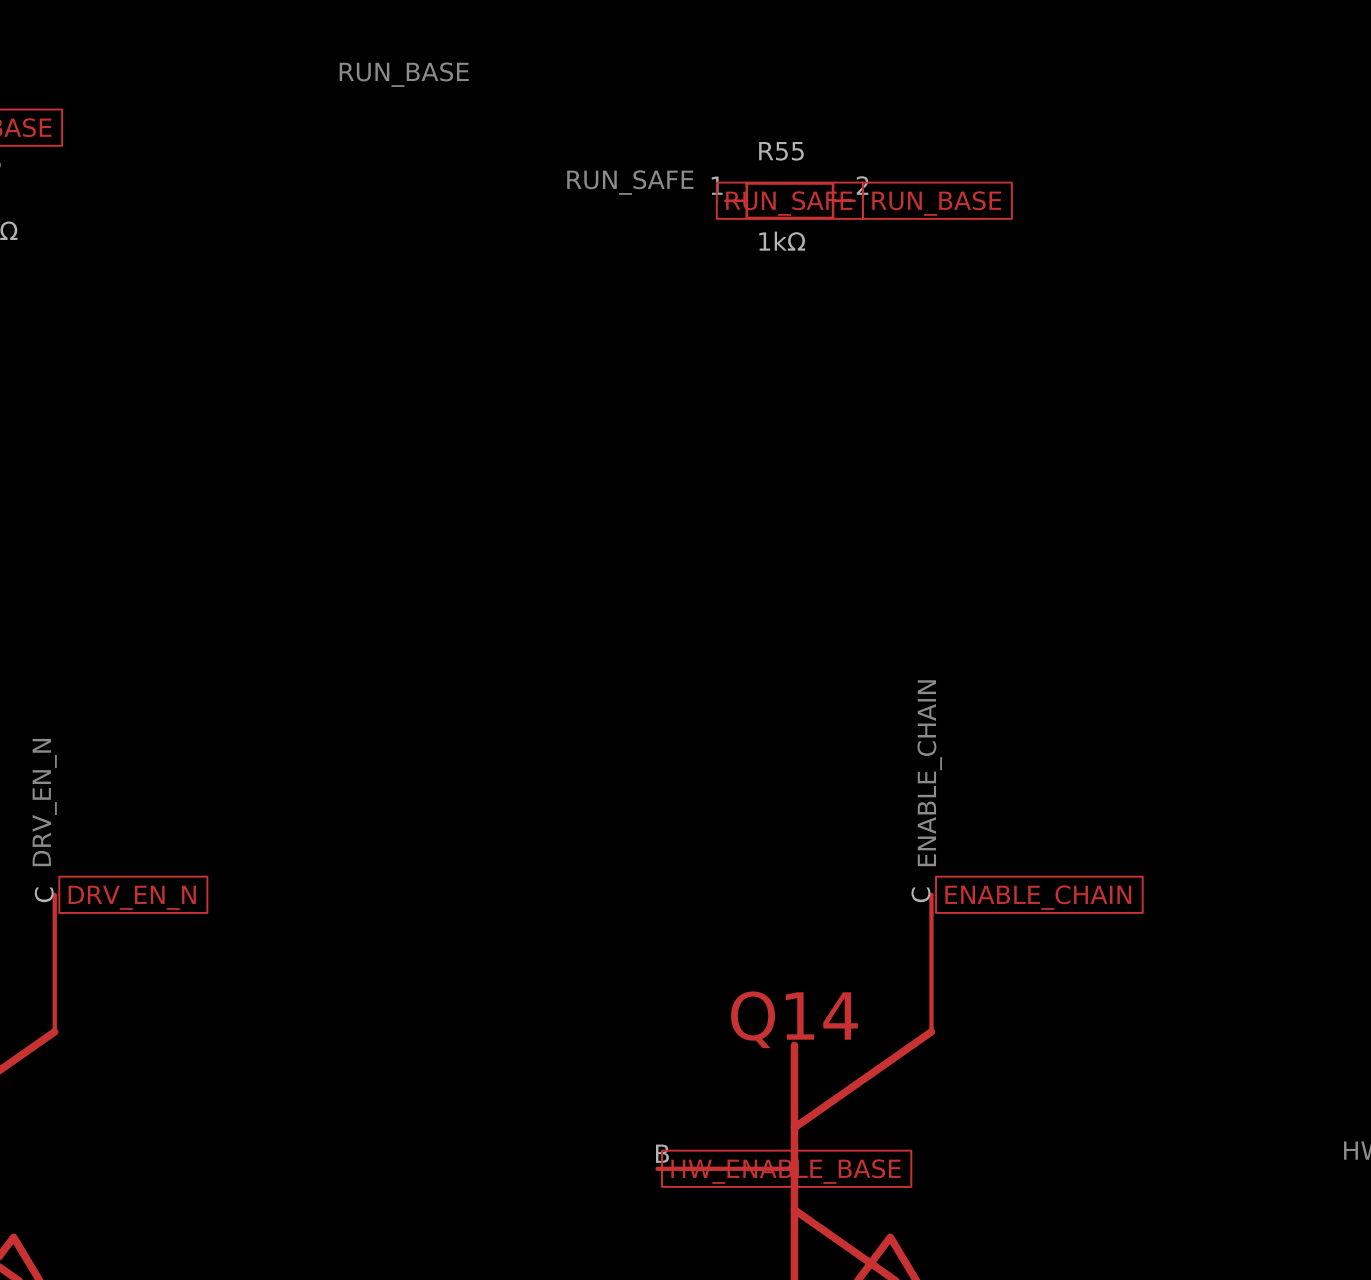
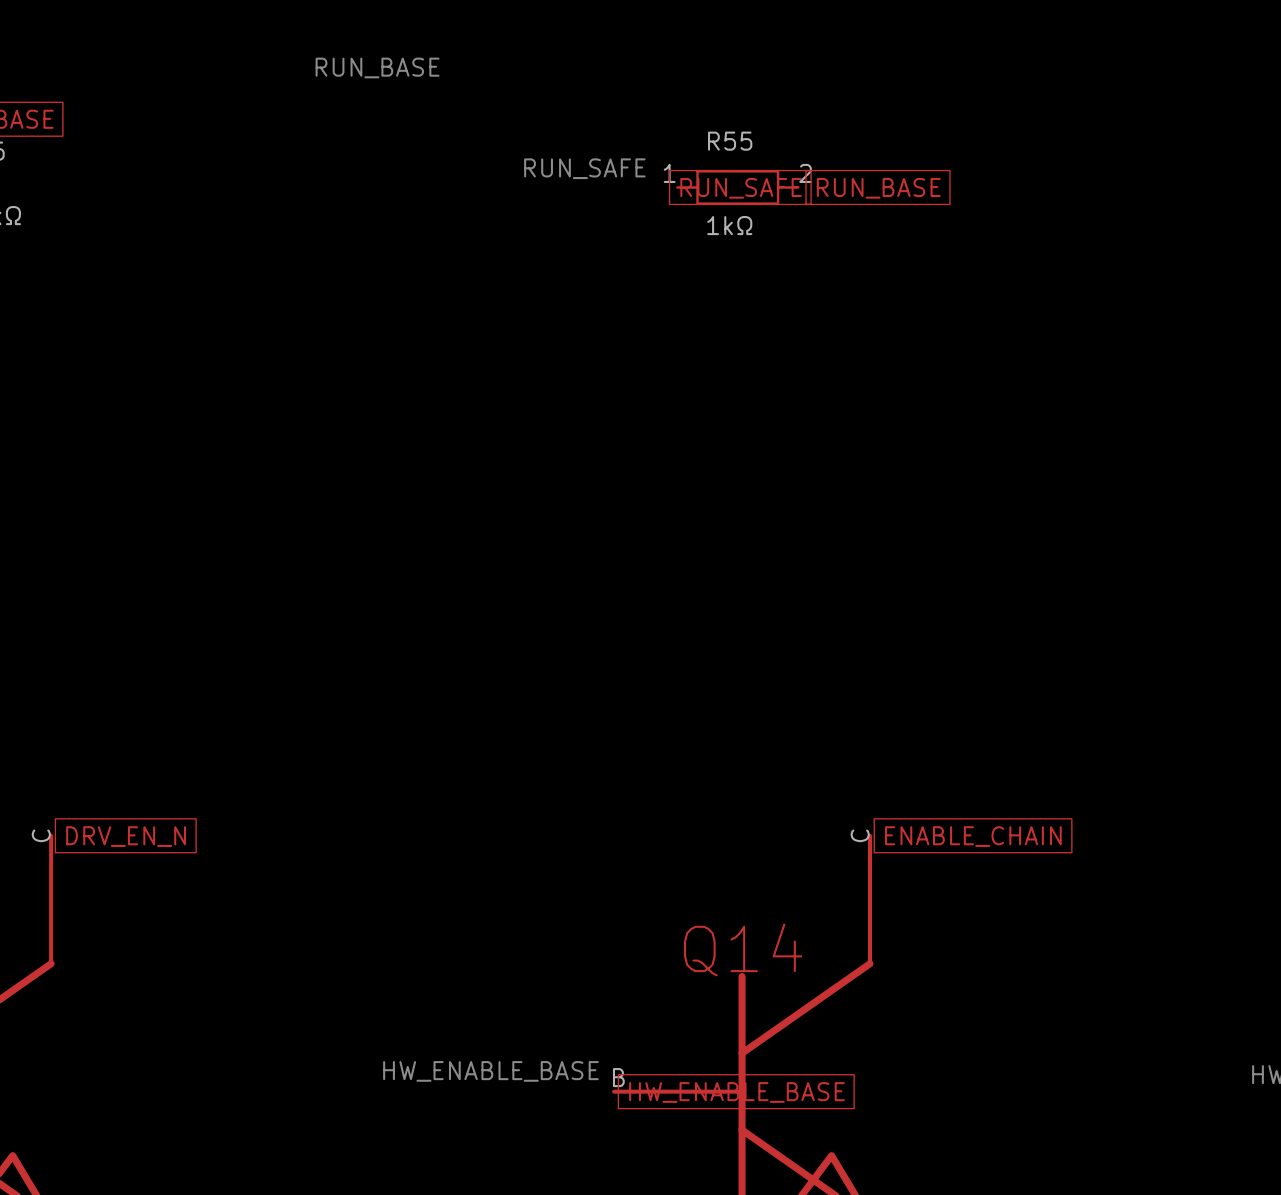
text: ENABLE_CHAIN (929, 773) -> none
text: DRV_EN_N (44, 802) -> none
text: none -> HW_ENABLE_BASE (490, 1071)

